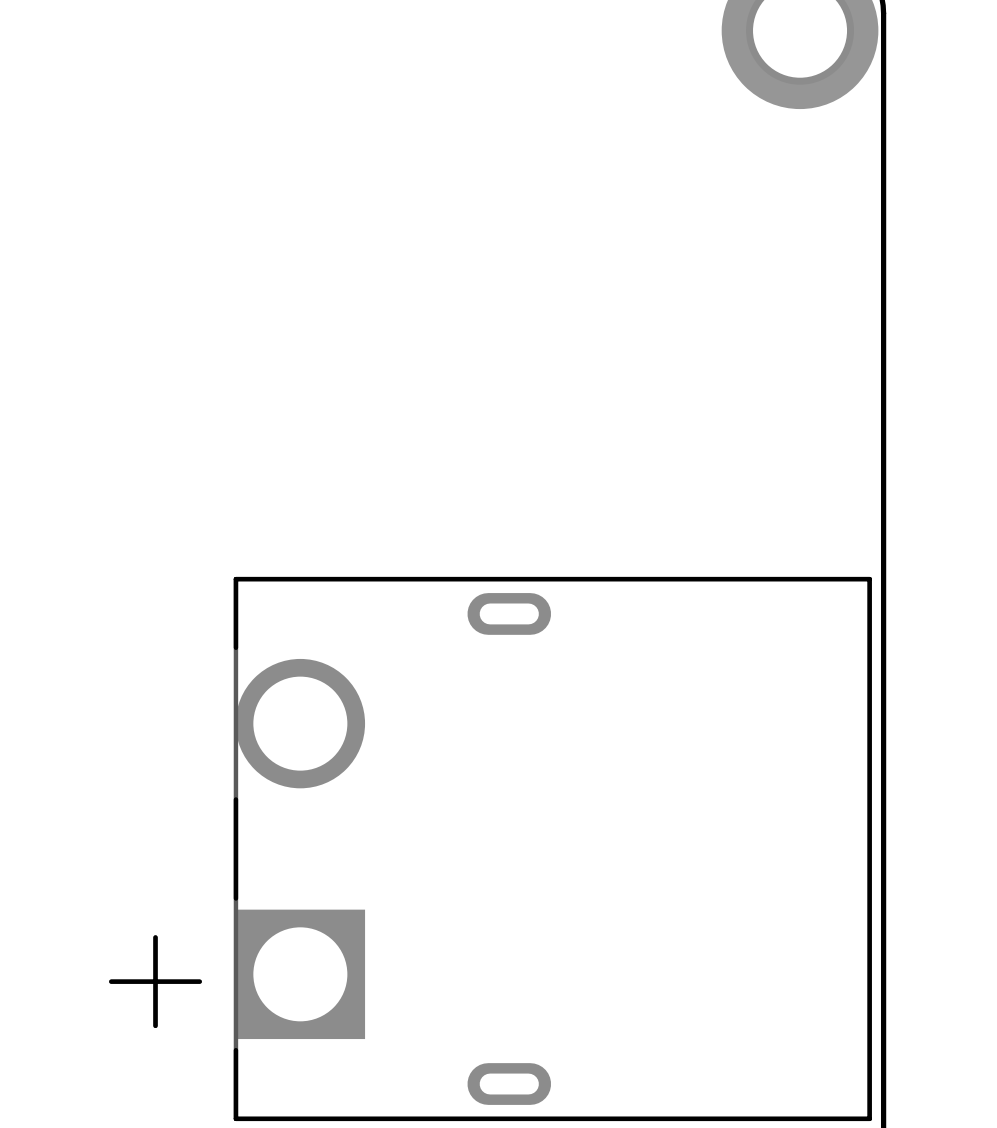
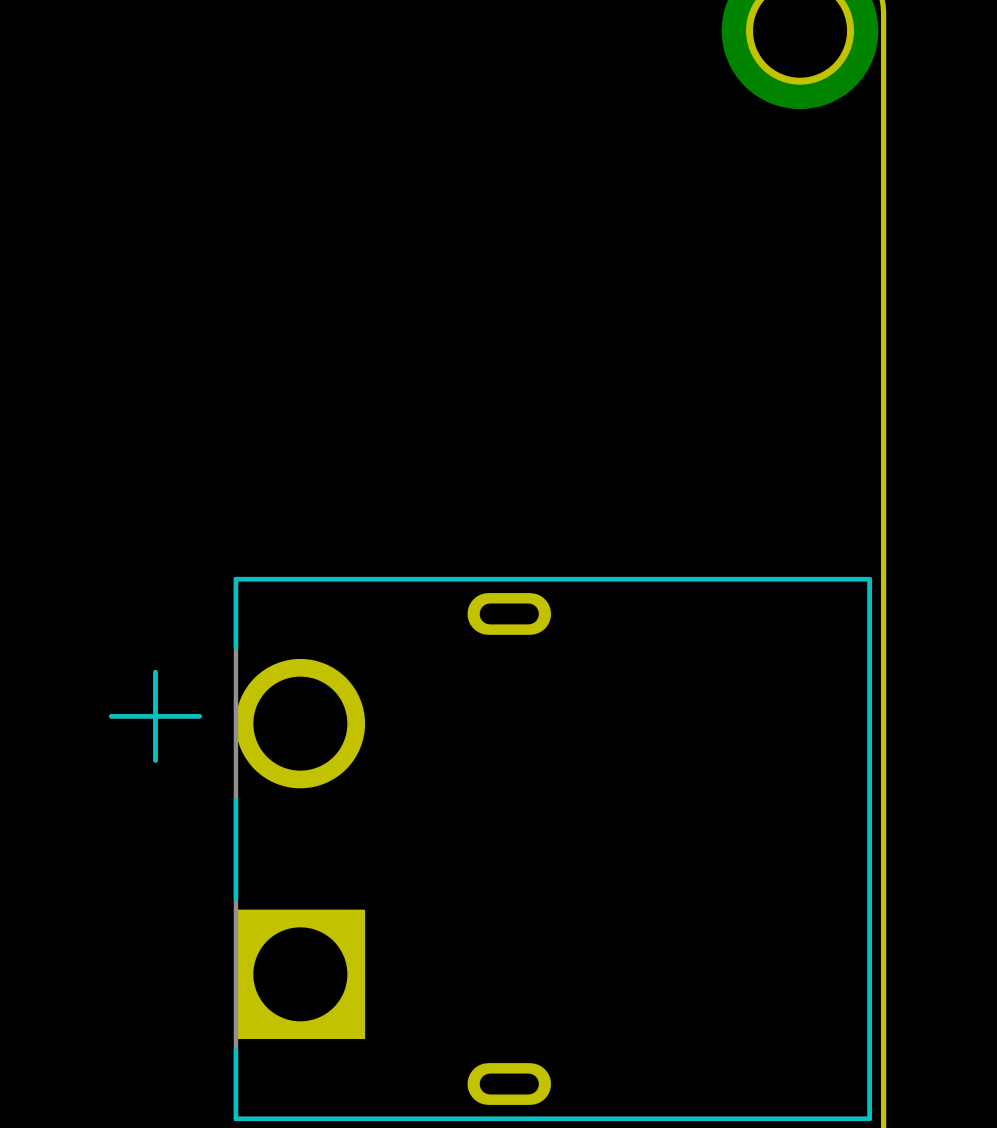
part footprint: [109, 576, 872, 1122] -> [109, 576, 872, 1122]

